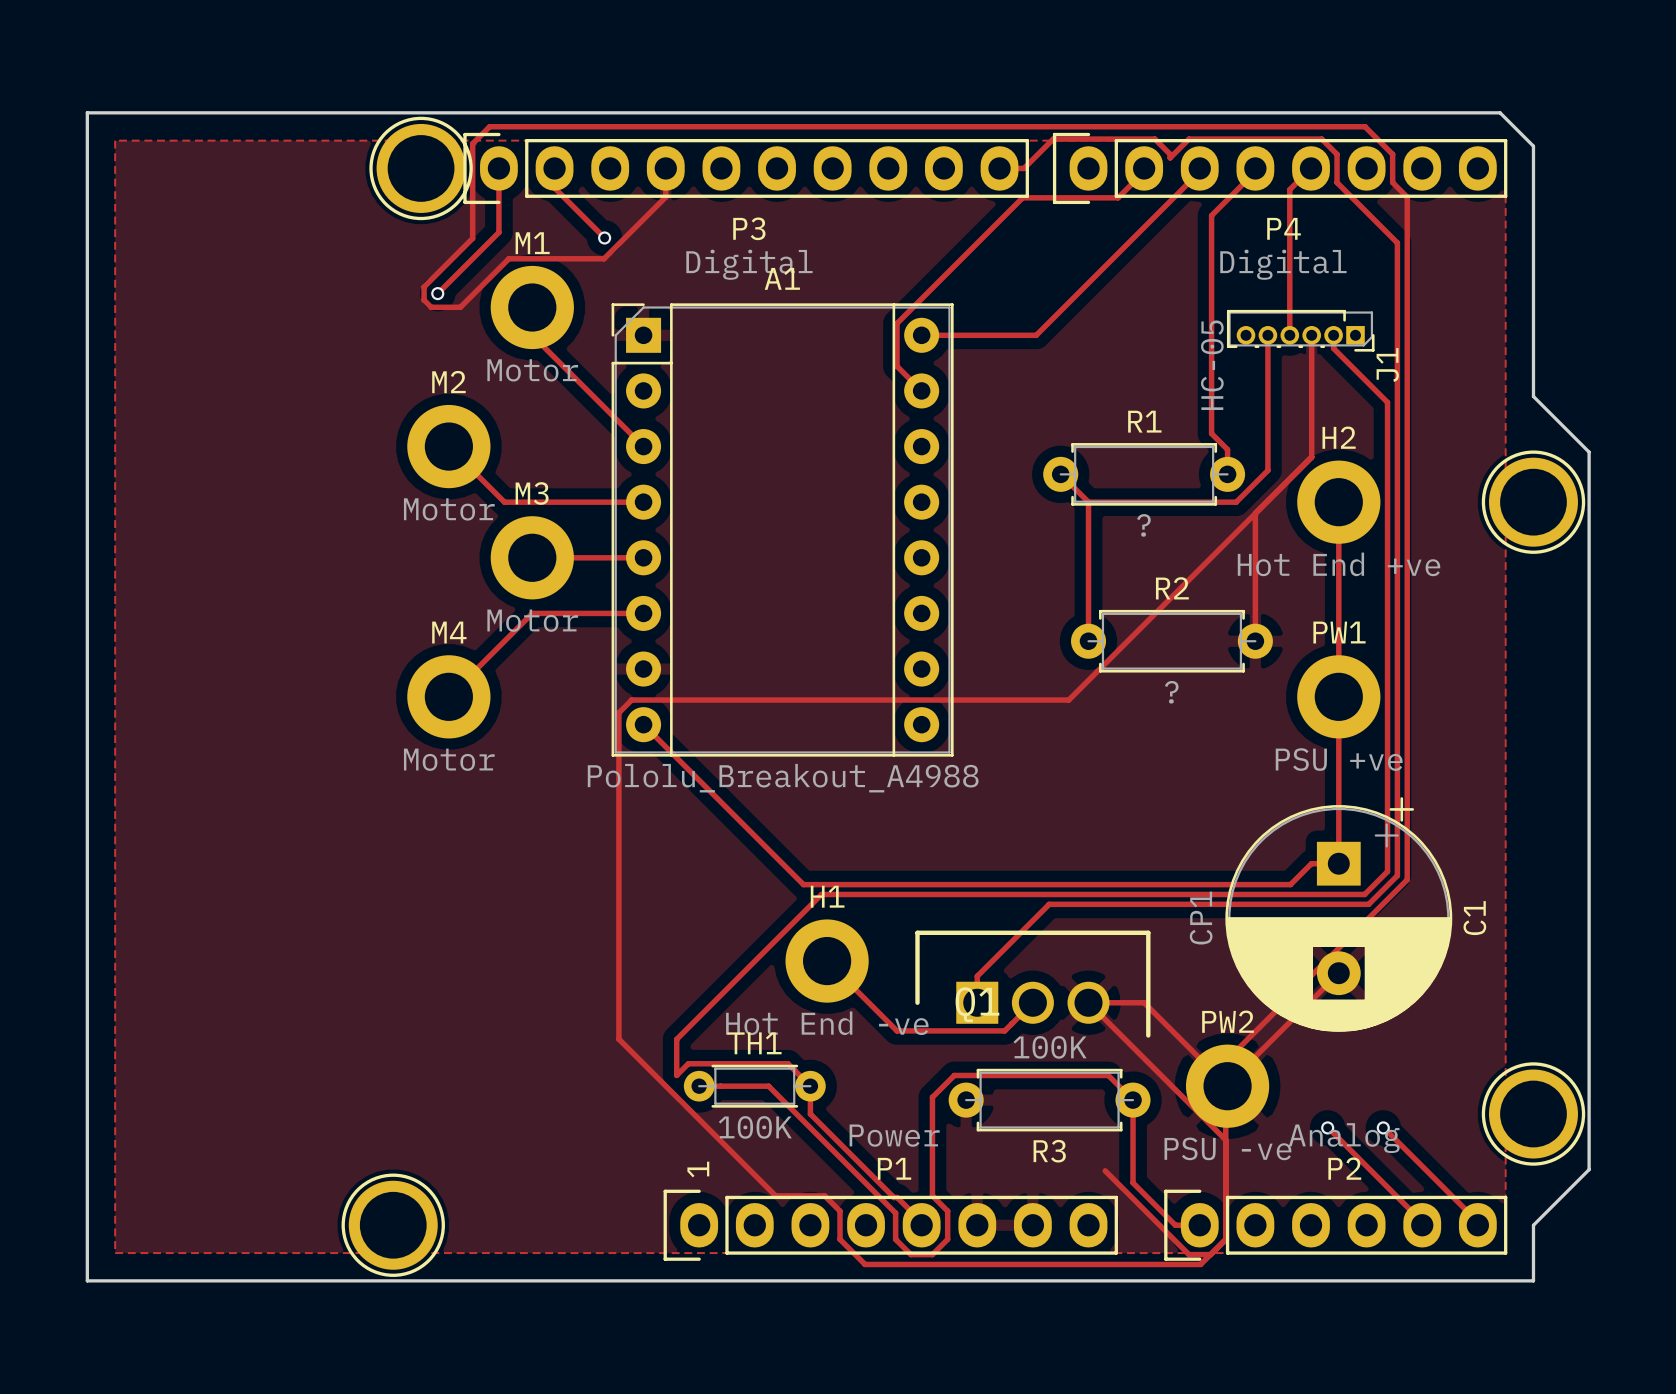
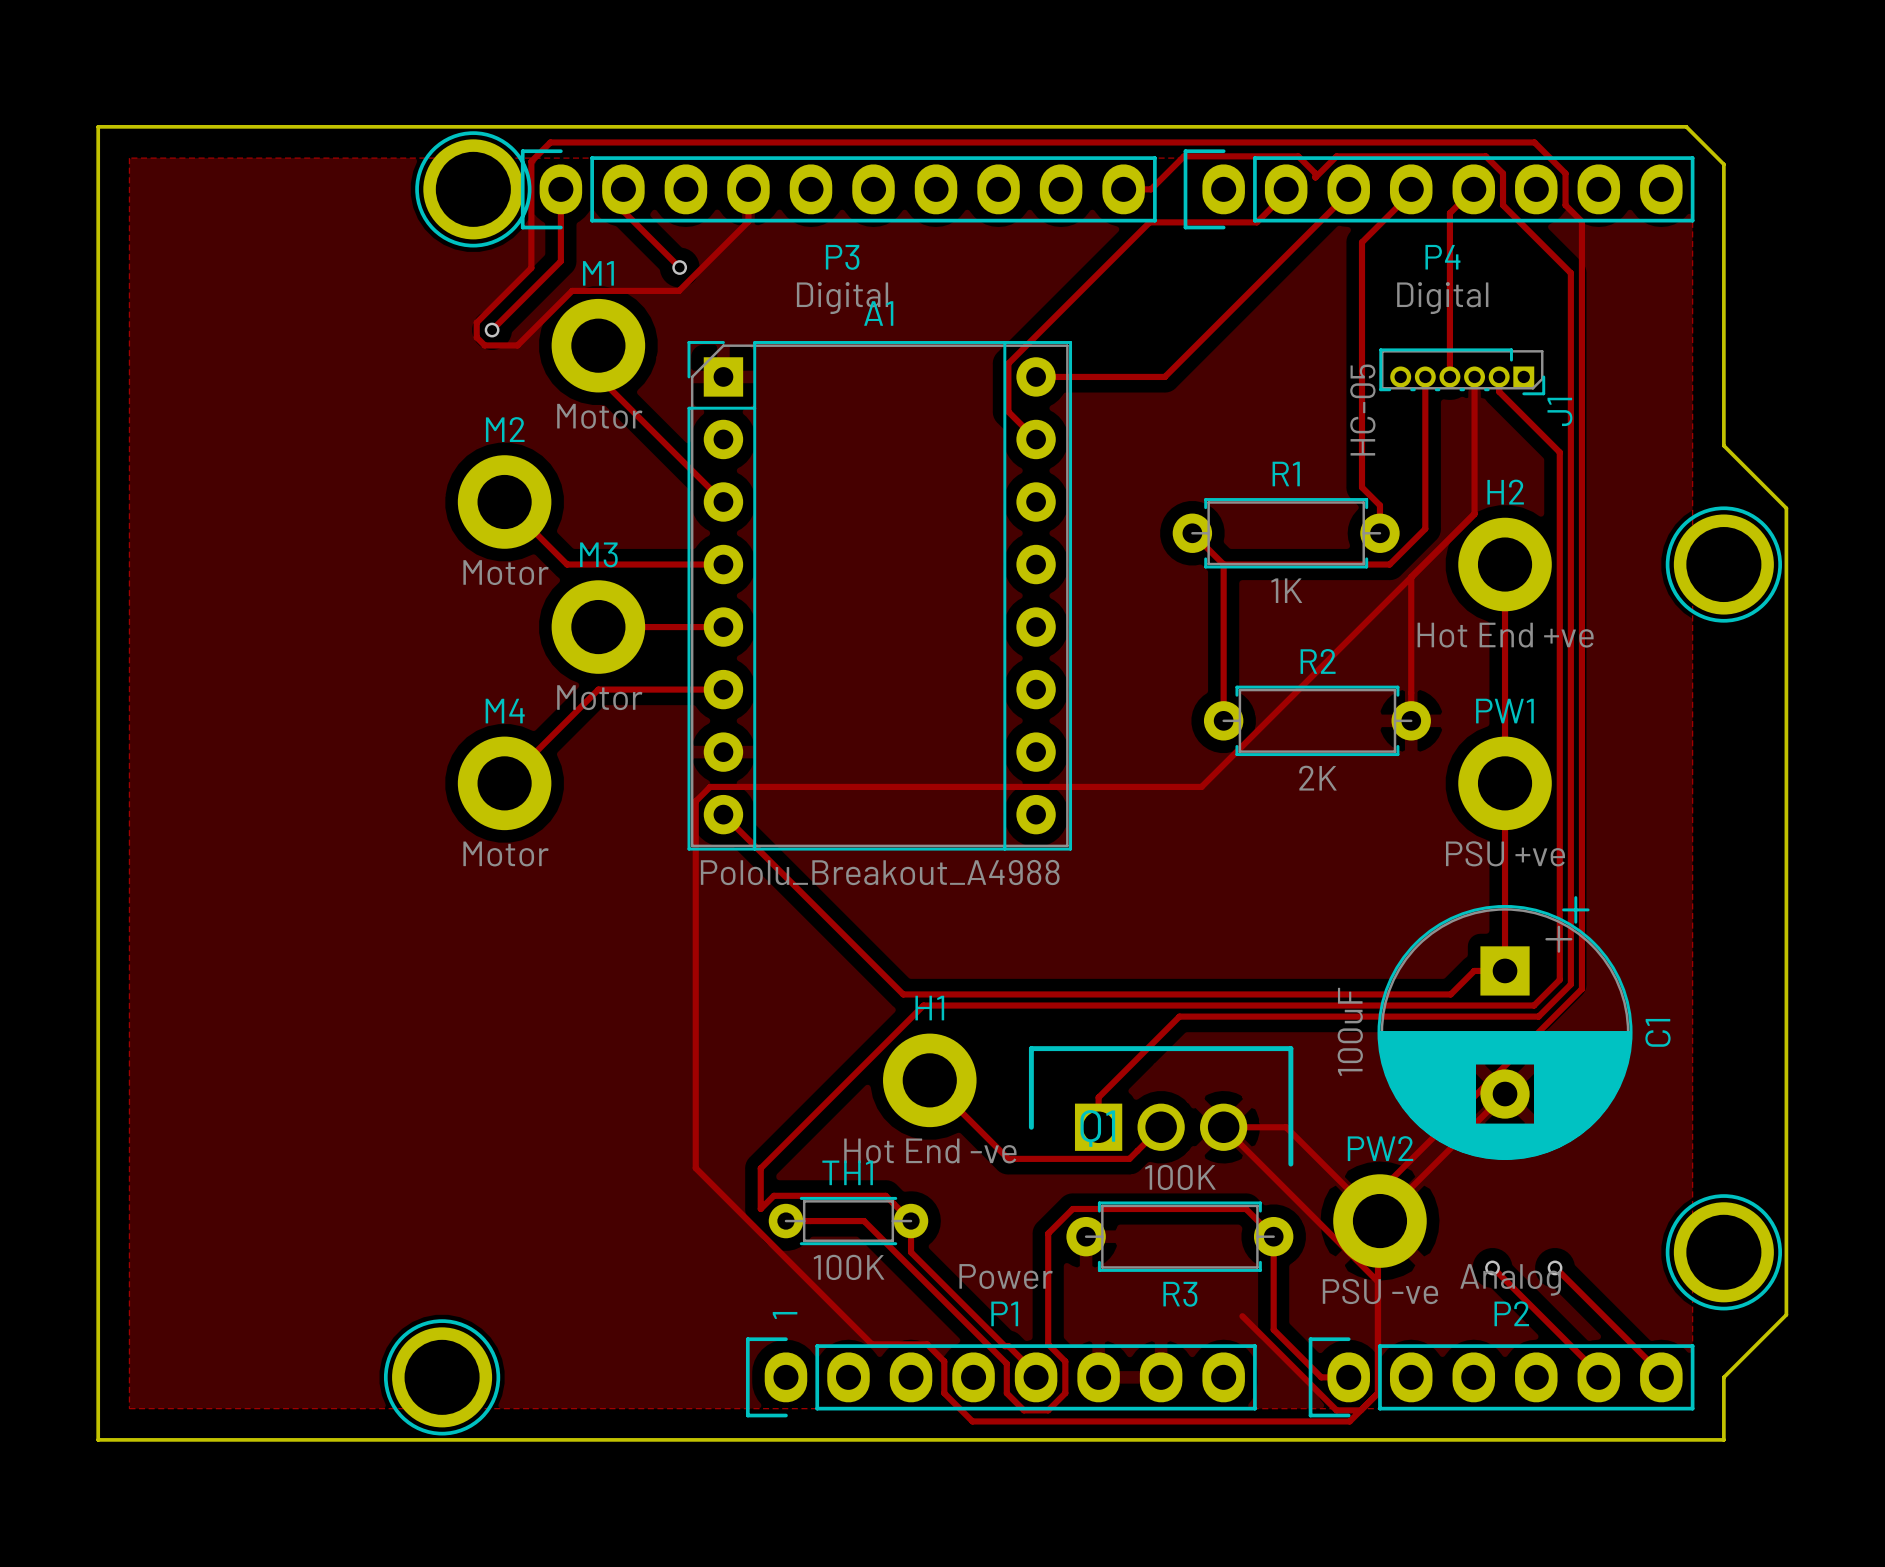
R1 value: ? (1143, 525) -> 1K (1286, 590)
R2 value: ? (1171, 692) -> 2K (1317, 778)
C1 value: CP1 (1201, 918) -> 100uF (1350, 1031)

